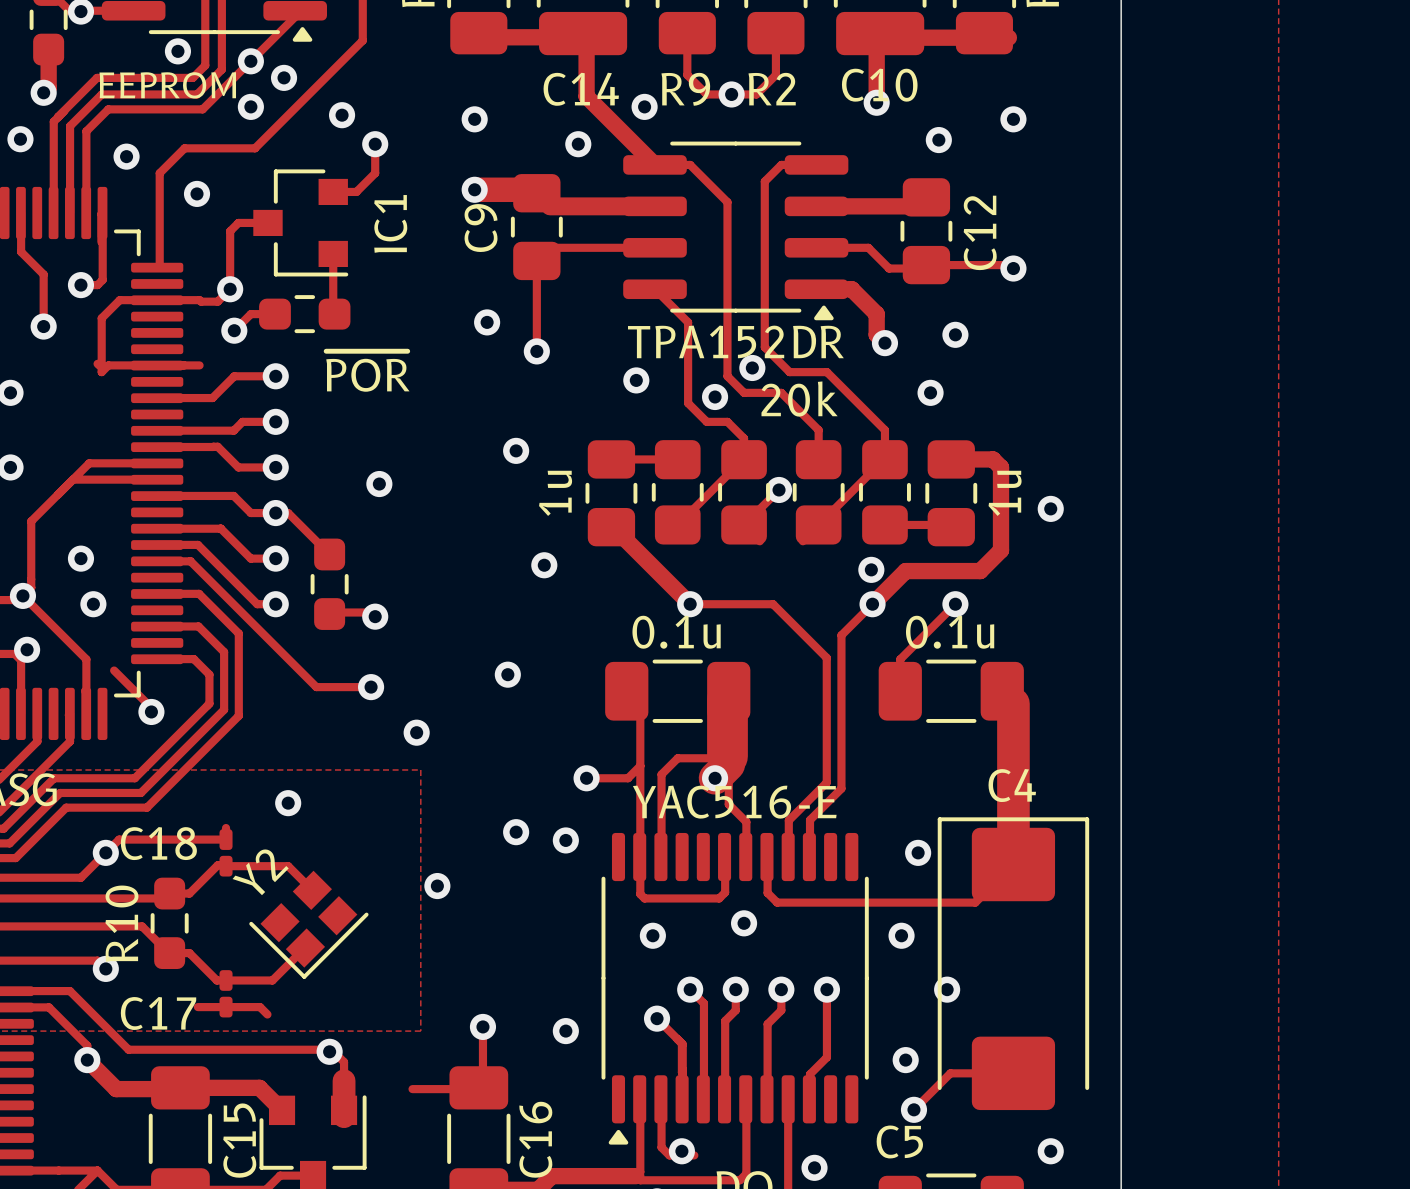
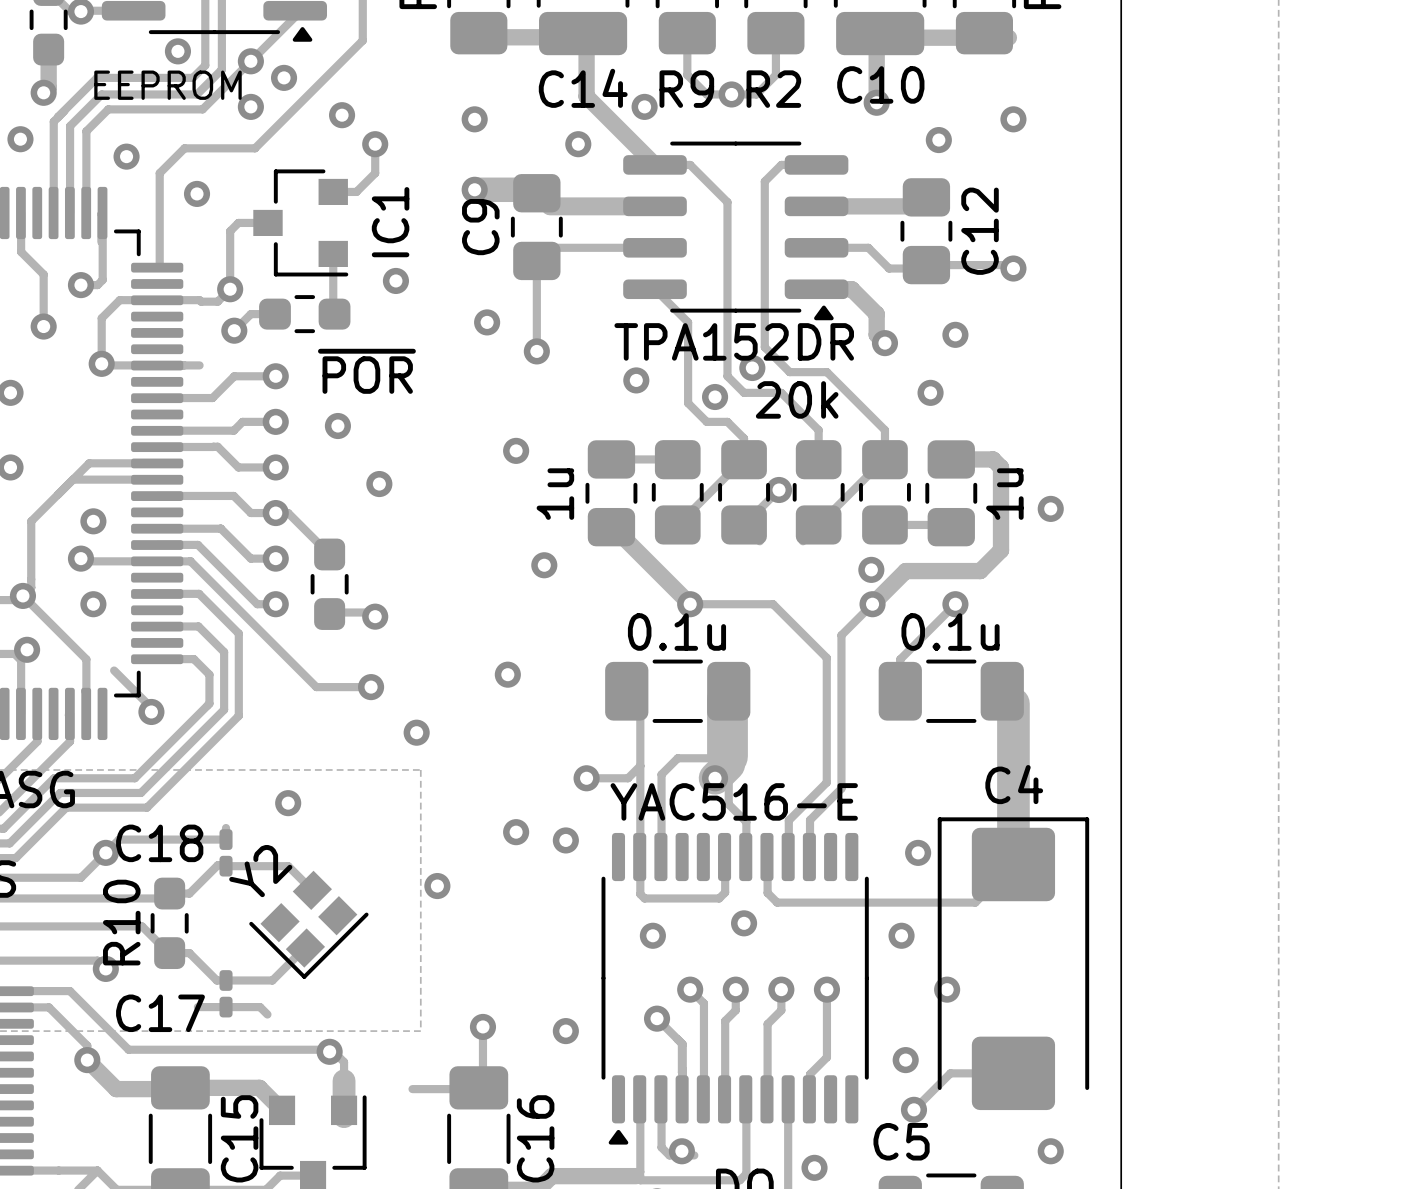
via: none -> (395, 280)
via: none -> (101, 363)
via: none -> (337, 426)
via: none -> (93, 521)
track: none -> (83, 561) (157, 561)

